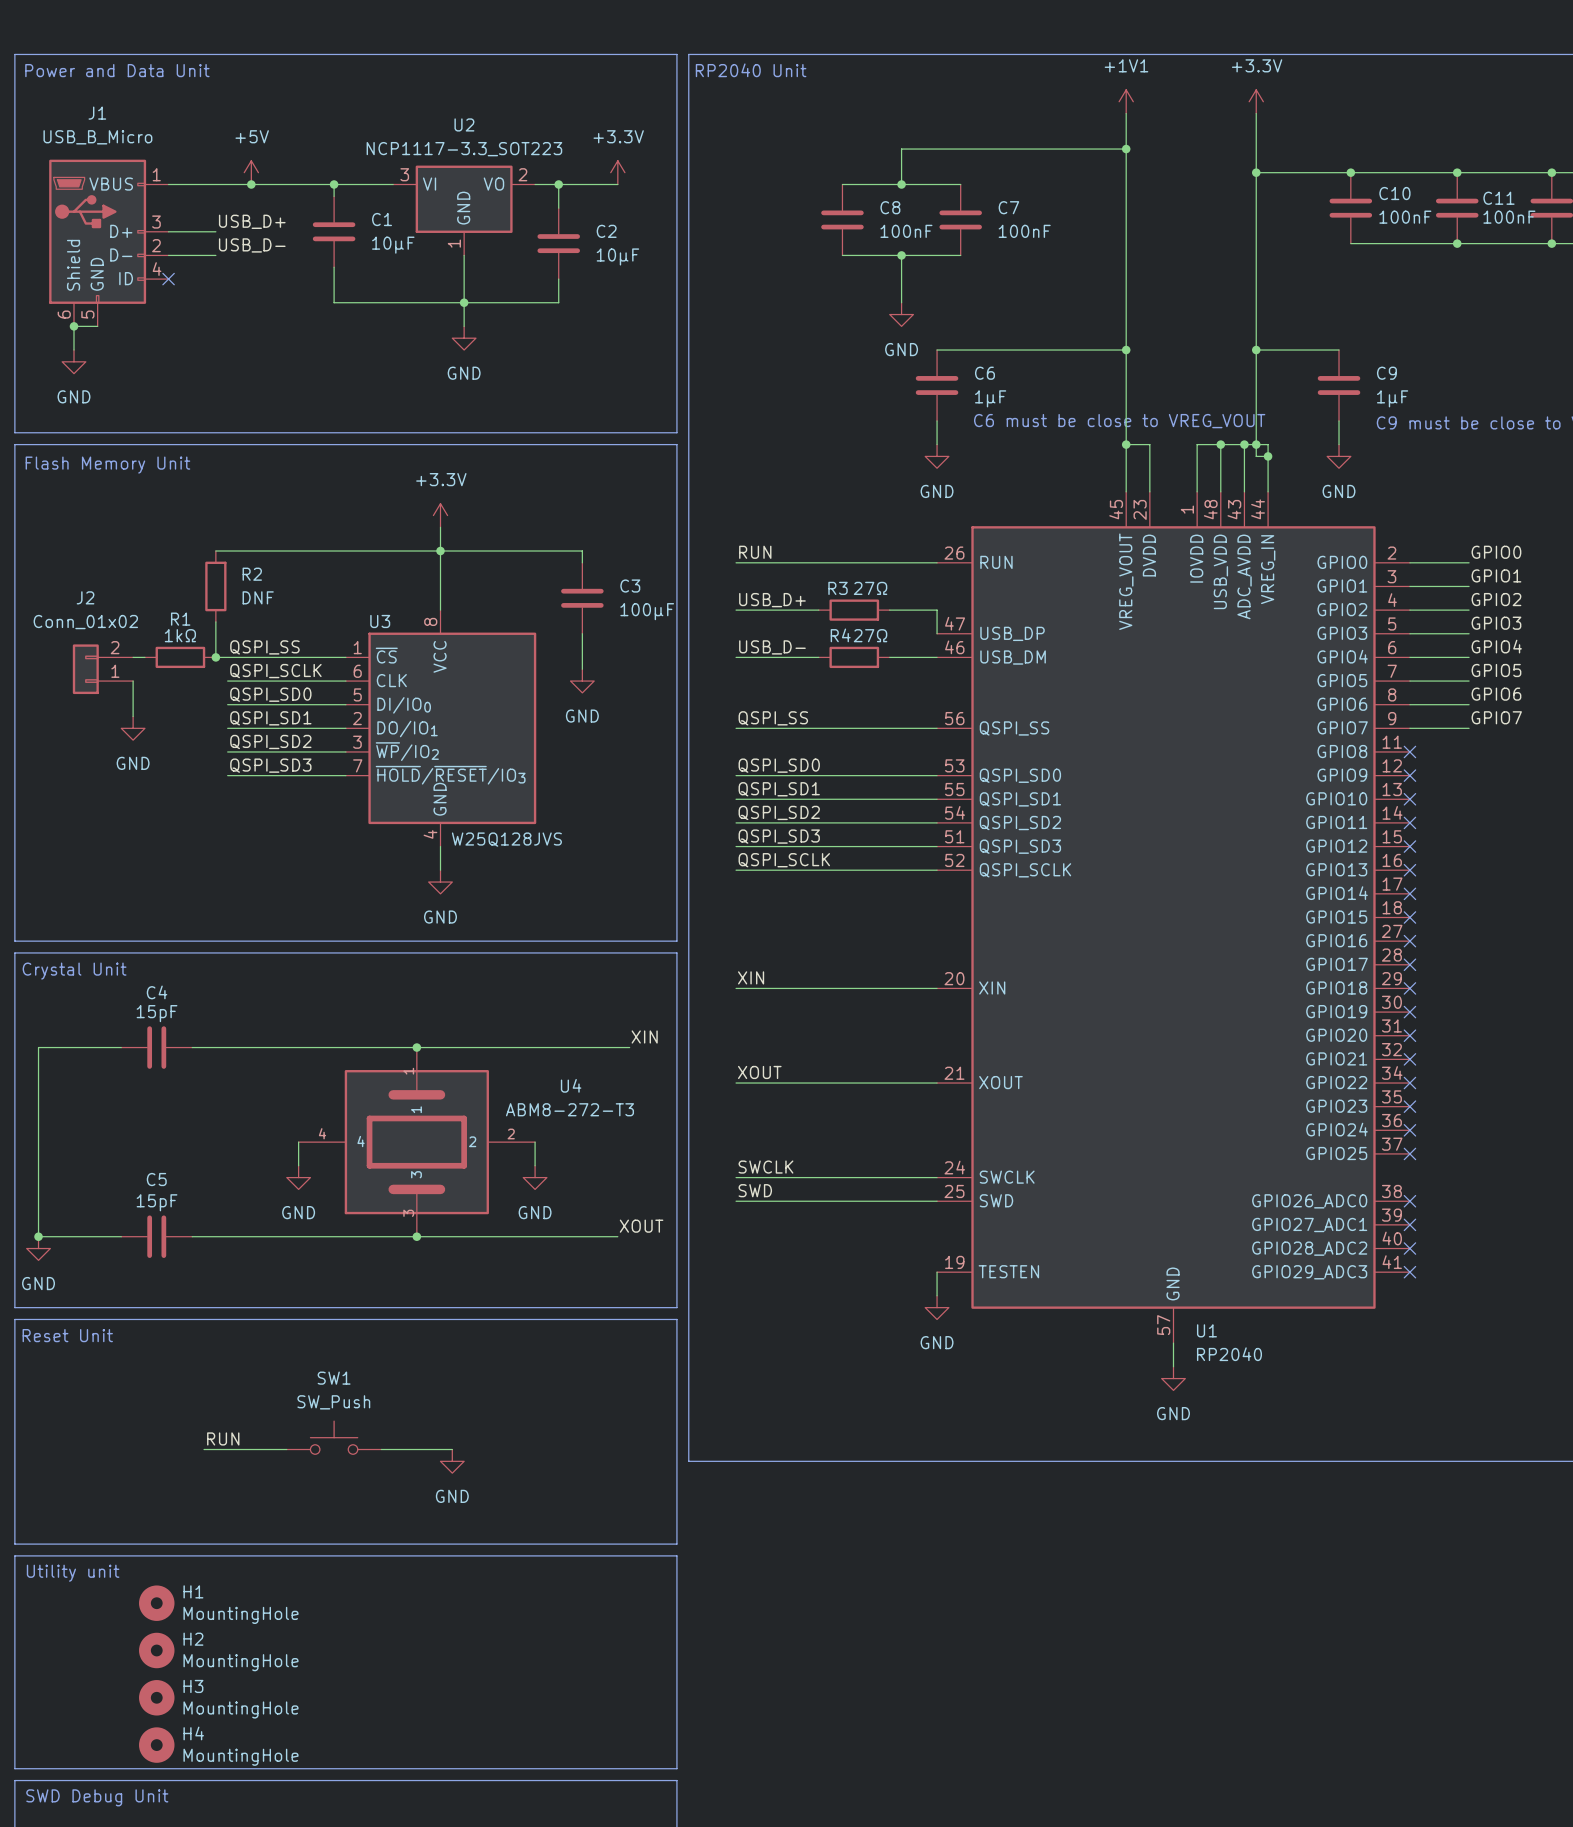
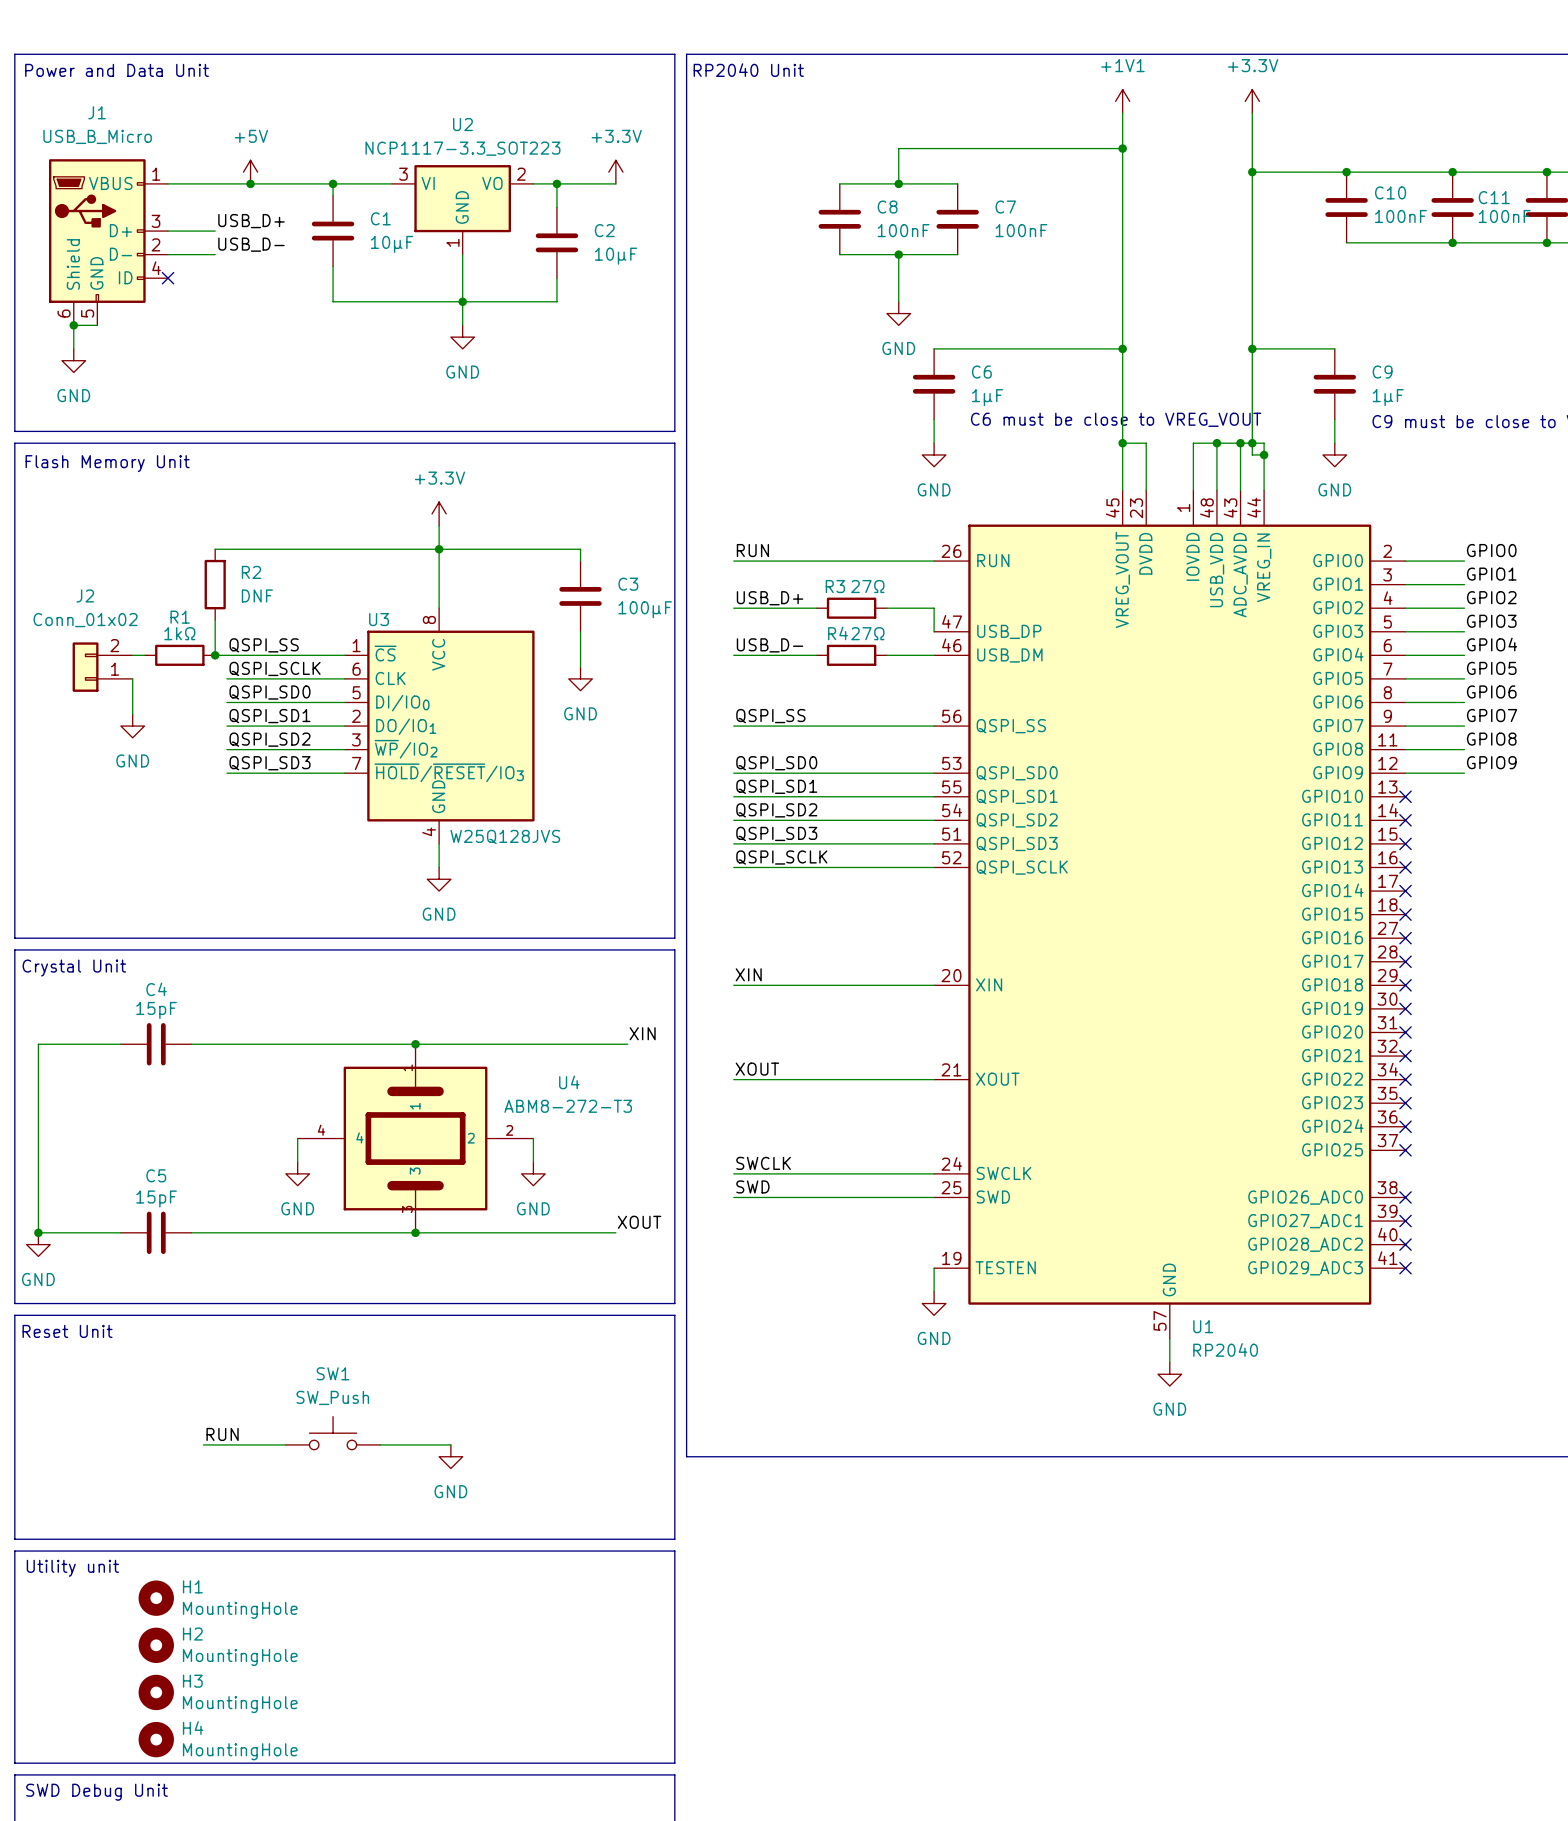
label: none -> GPIO8 (1491, 739)
wire: none -> (1405, 749) (1464, 749)
no-connect mark: (1409, 751) -> none
label: none -> GPIO9 (1491, 762)
wire: none -> (1405, 773) (1464, 773)
no-connect mark: (1409, 775) -> none

